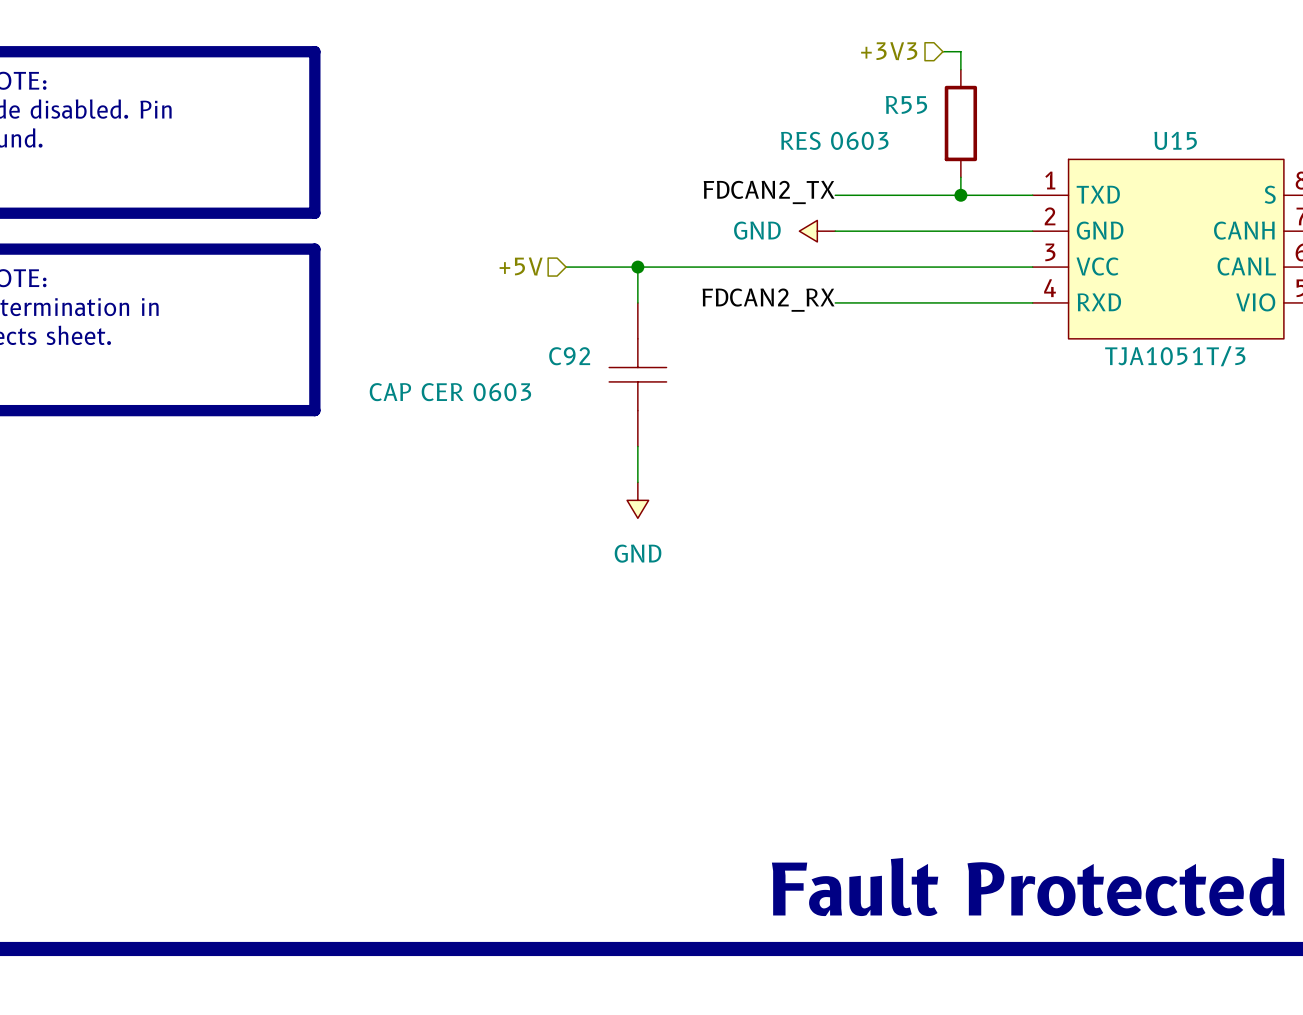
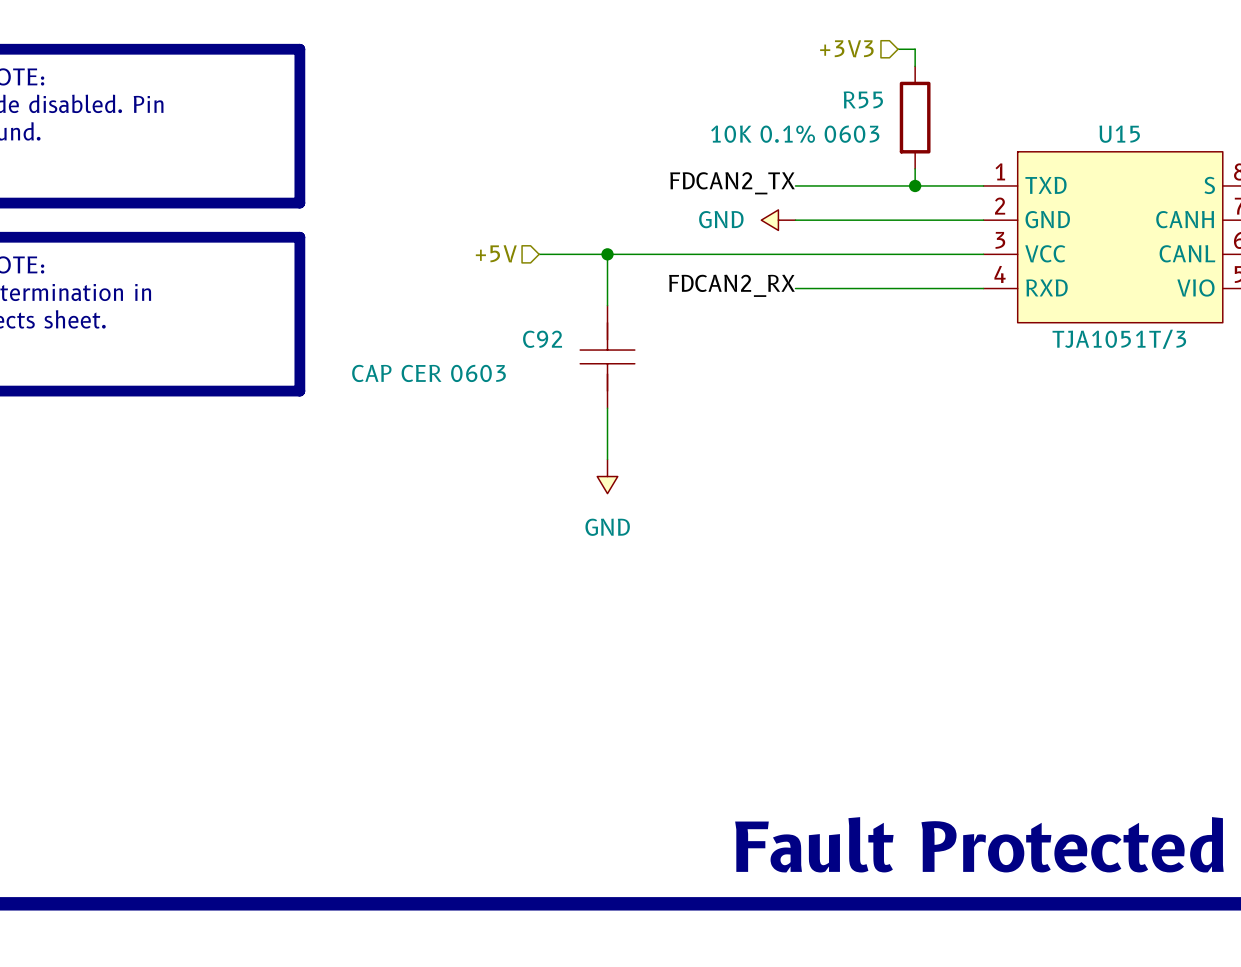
R55 value: RES 0603 (834, 140) -> 10K 0.1% 0603 (795, 134)
C92 symbol: [609, 302, 667, 447] -> [580, 305, 635, 409]

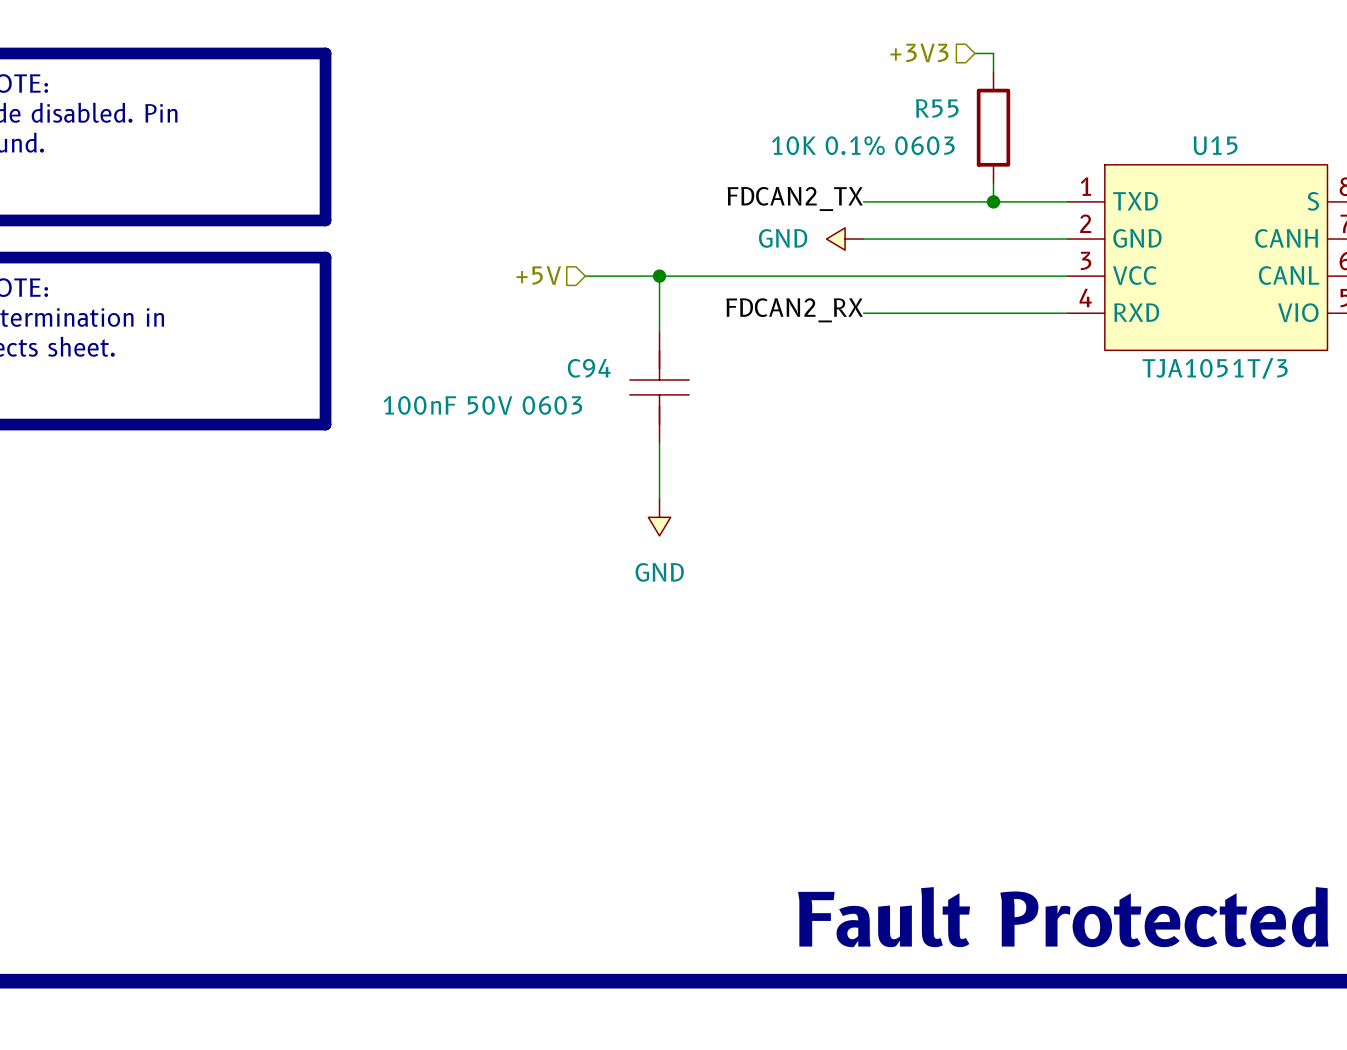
C92 name: C92 (542, 339) -> C94 (589, 368)
C92 value: CAP CER 0603 (428, 373) -> 100nF 50V 0603 (482, 405)

